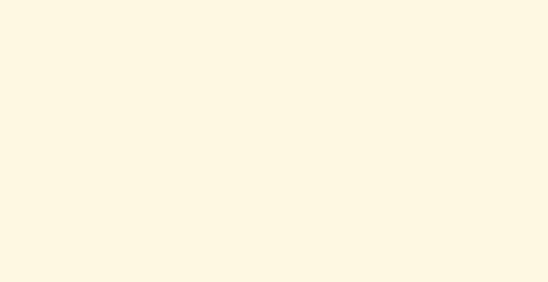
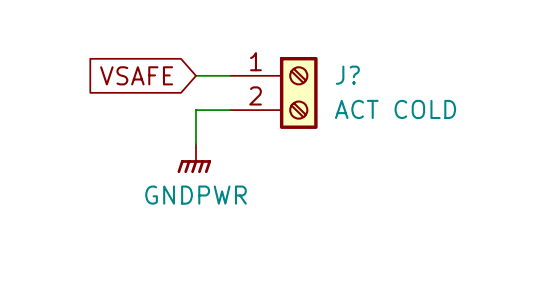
global label: none -> VSAFE (136, 75)
wire: none -> (196, 75) (230, 75)
J?: none -> ACT COLD (273, 92)
wire: none -> (230, 110) (196, 110) (196, 144)
power symbol: none -> GNDPWR (194, 158)

